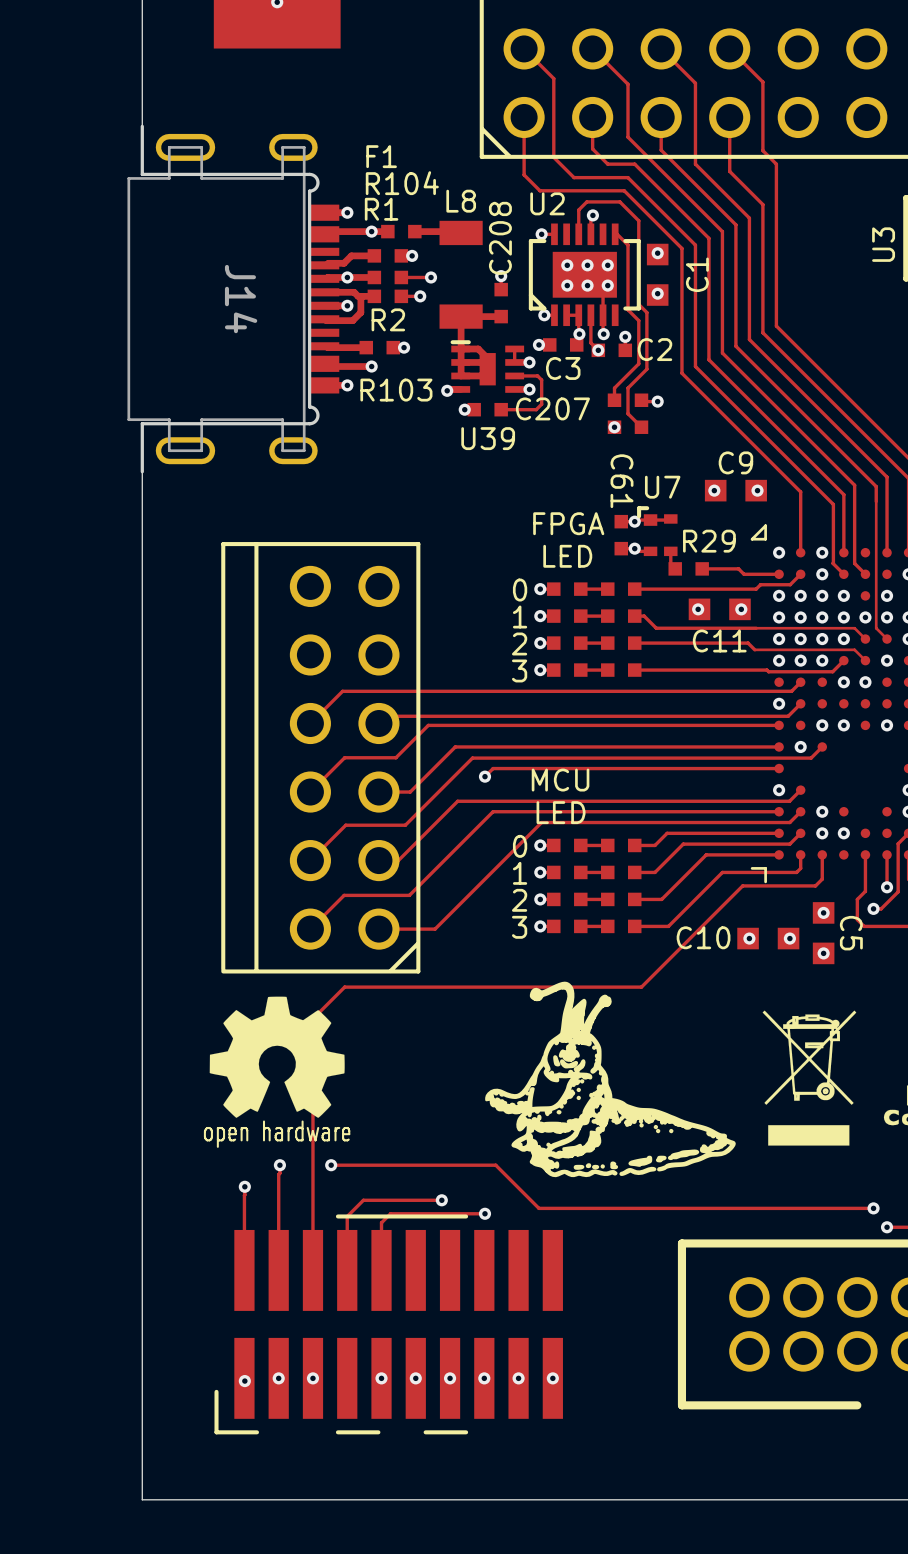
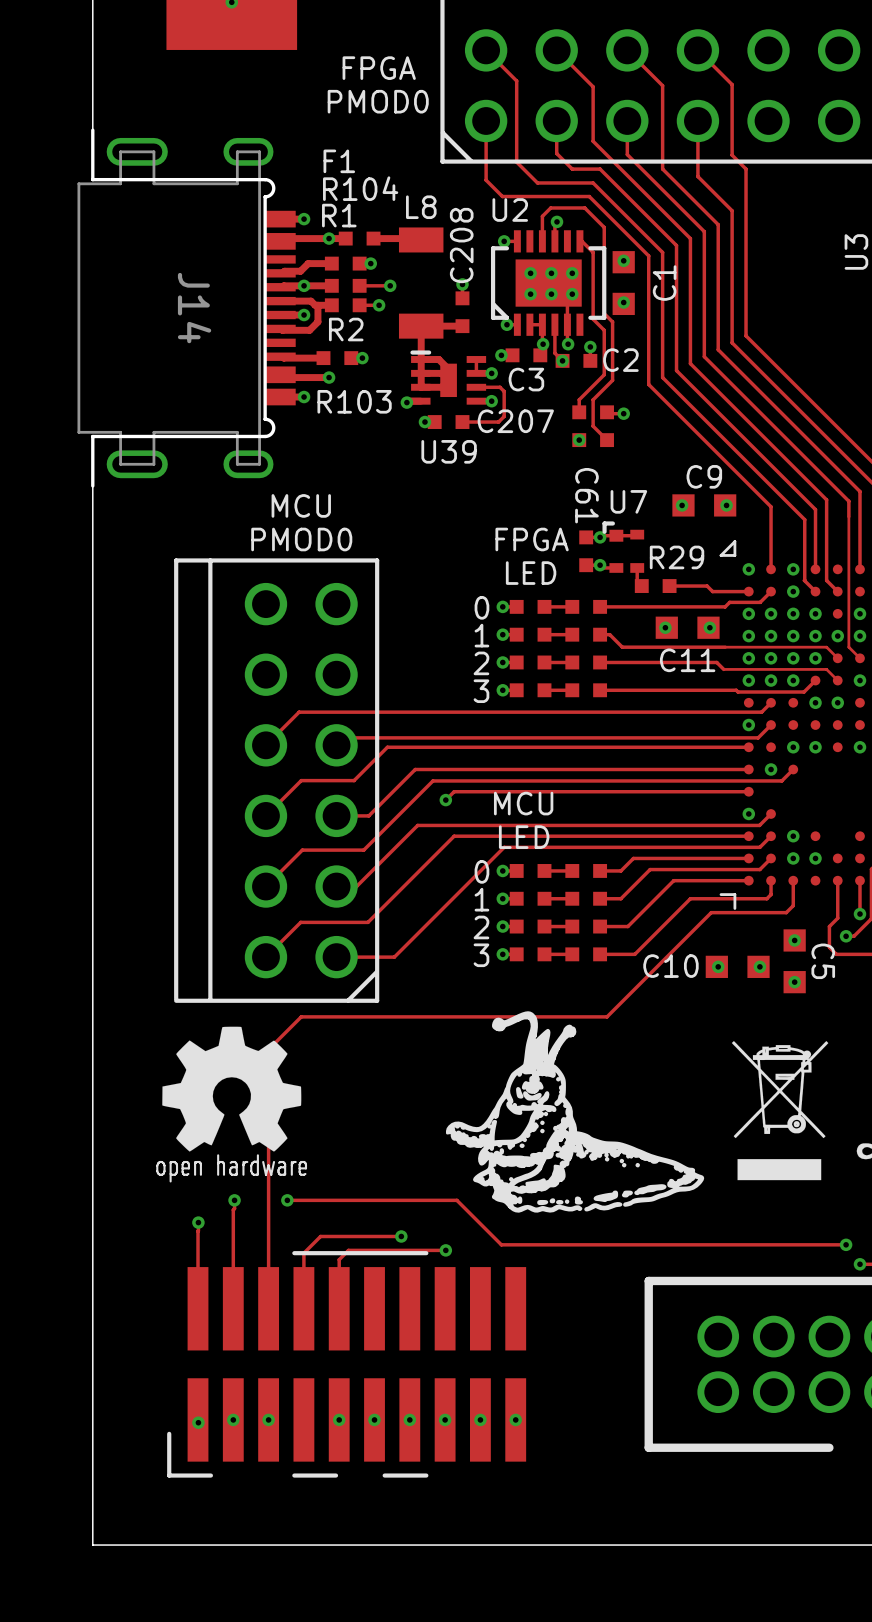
text: none -> FPGA (379, 68)
text: none -> PMOD0 (378, 101)
text: none -> MCU (301, 505)
text: none -> PMOD0 (301, 539)

